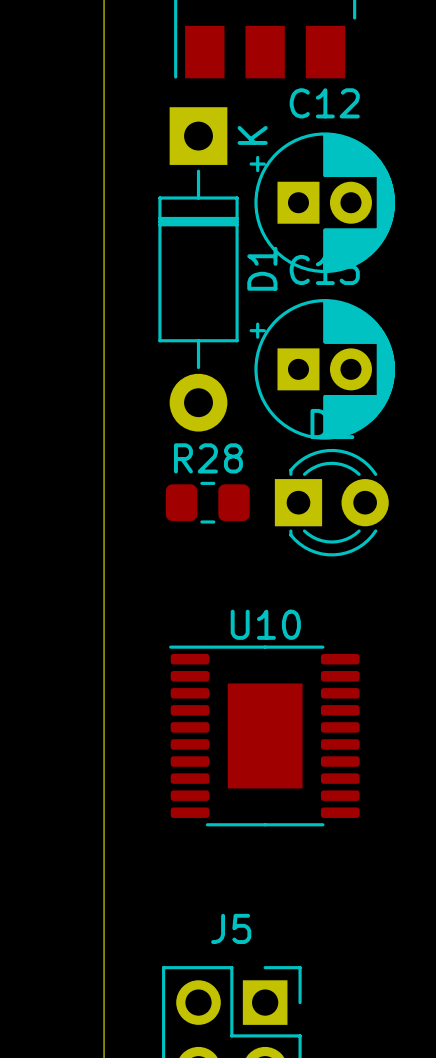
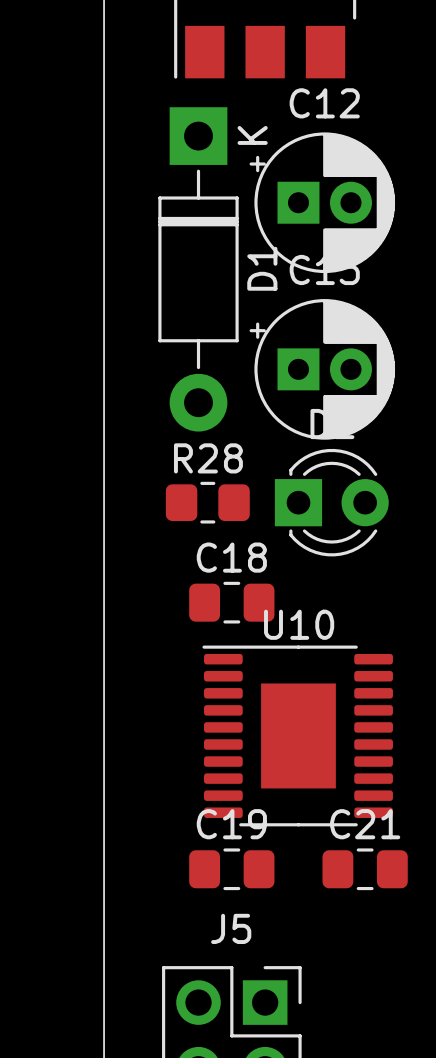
C18: none -> (231, 602)
U10 position: (264, 735) -> (297, 735)
C19: none -> (231, 869)
C21: none -> (365, 869)

